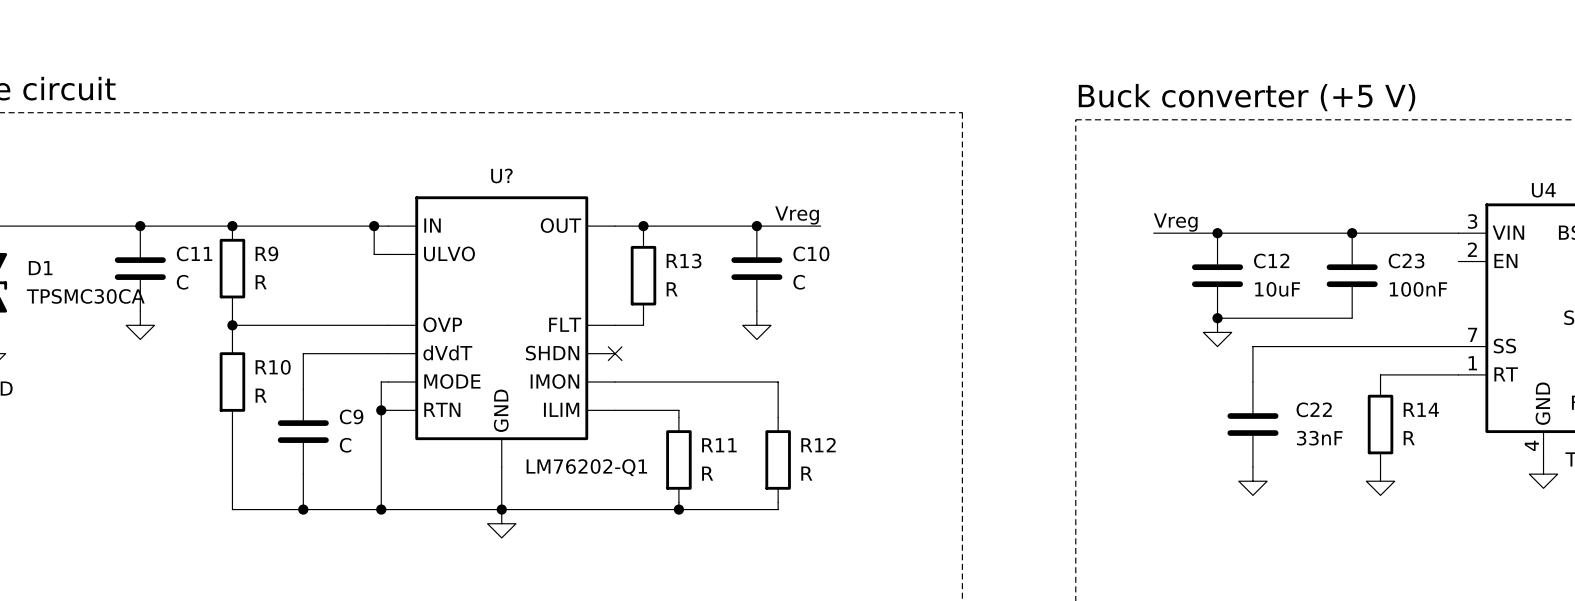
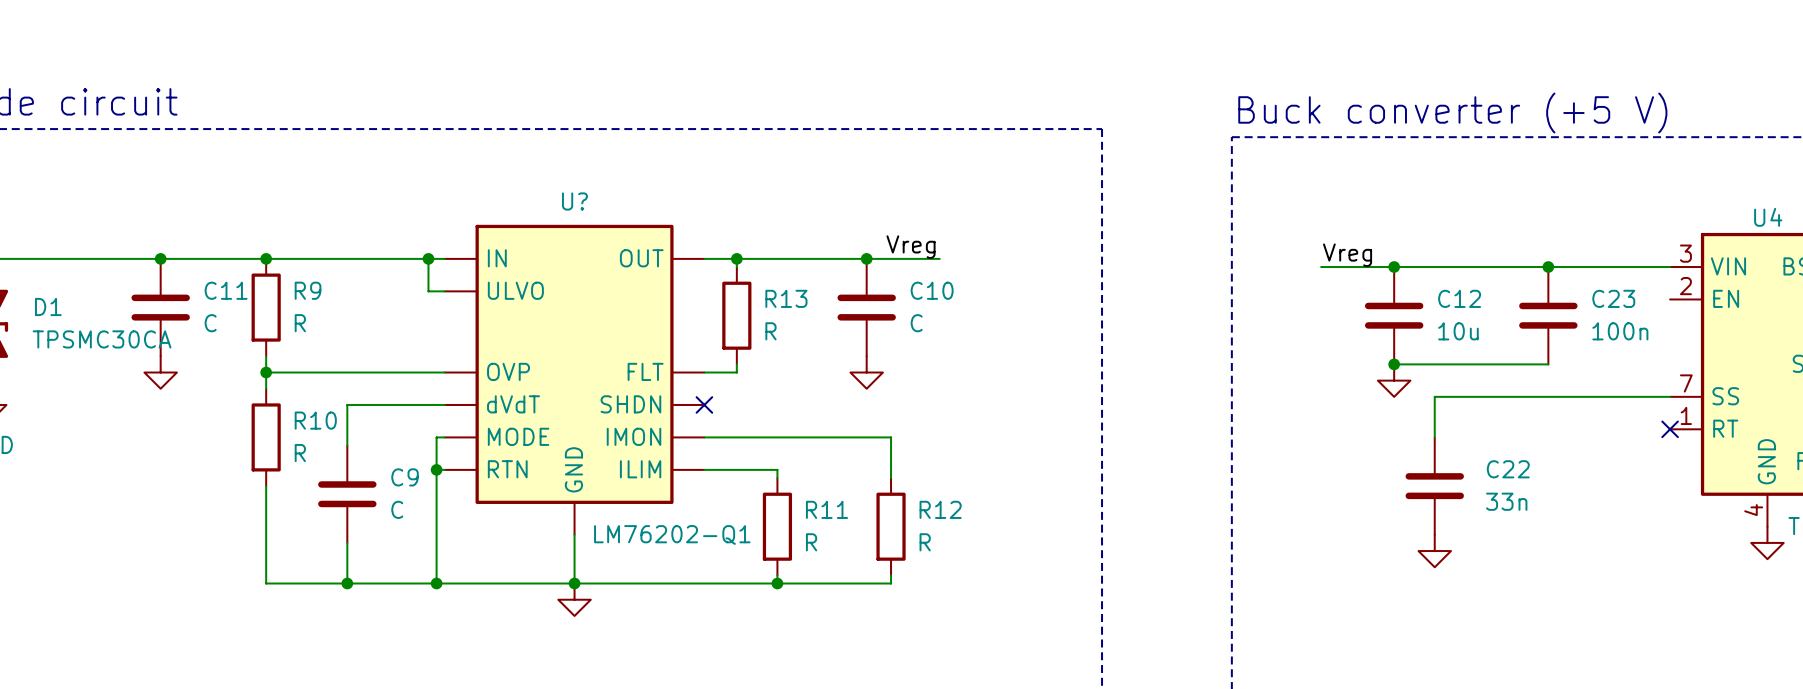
C12 value: 10uF (1277, 289) -> 10u (1458, 331)
C23 value: 100nF (1418, 289) -> 100n (1620, 331)
wire: (1458, 374) (1380, 374) (1380, 382) -> none
no-connect mark: none -> (1670, 429)
R14: R (1380, 424) -> none
C22 value: 33nF (1319, 438) -> 33n (1506, 501)
power symbol: (1380, 481) -> none

